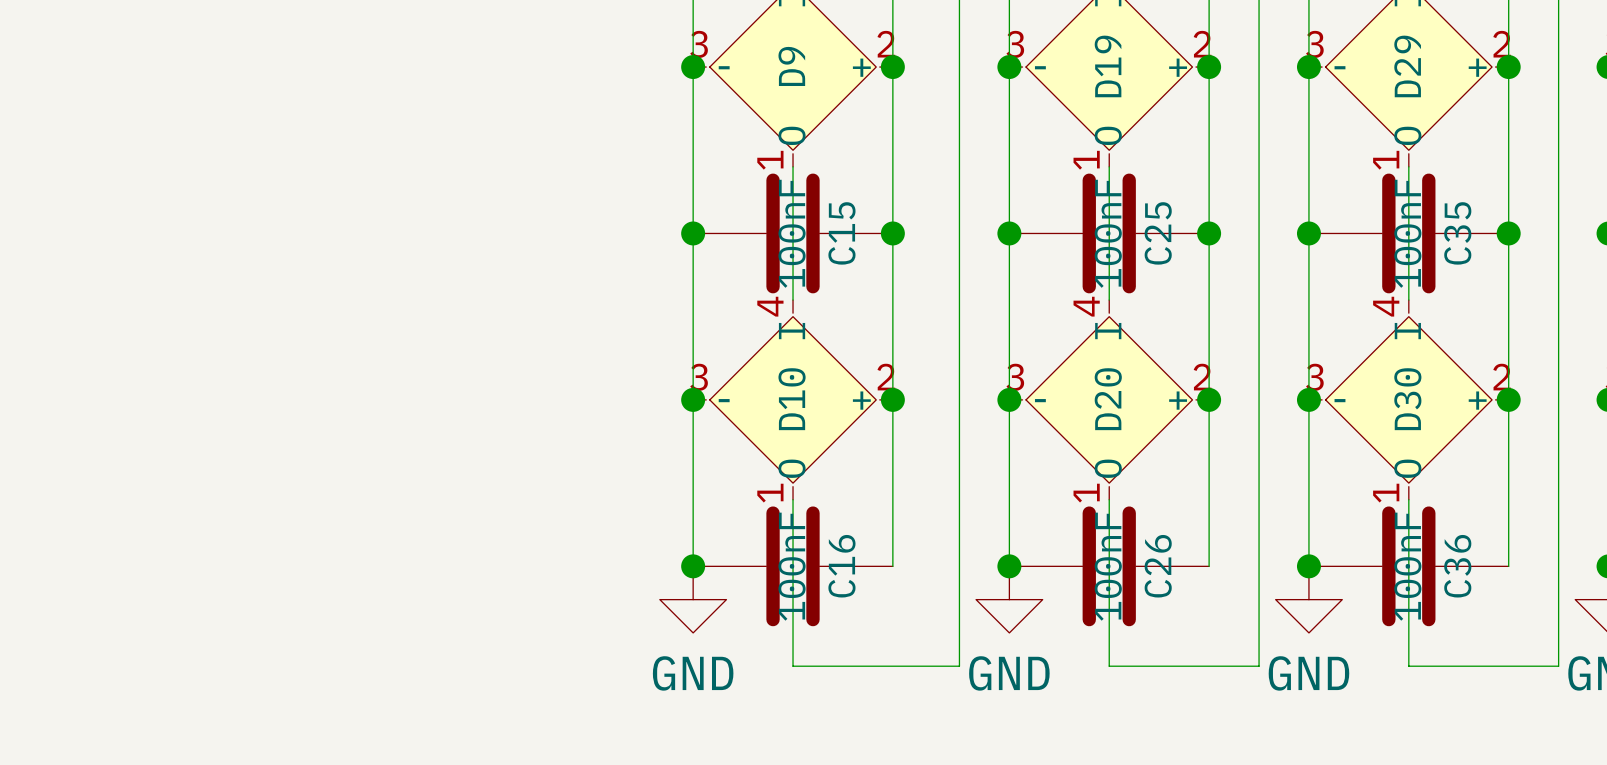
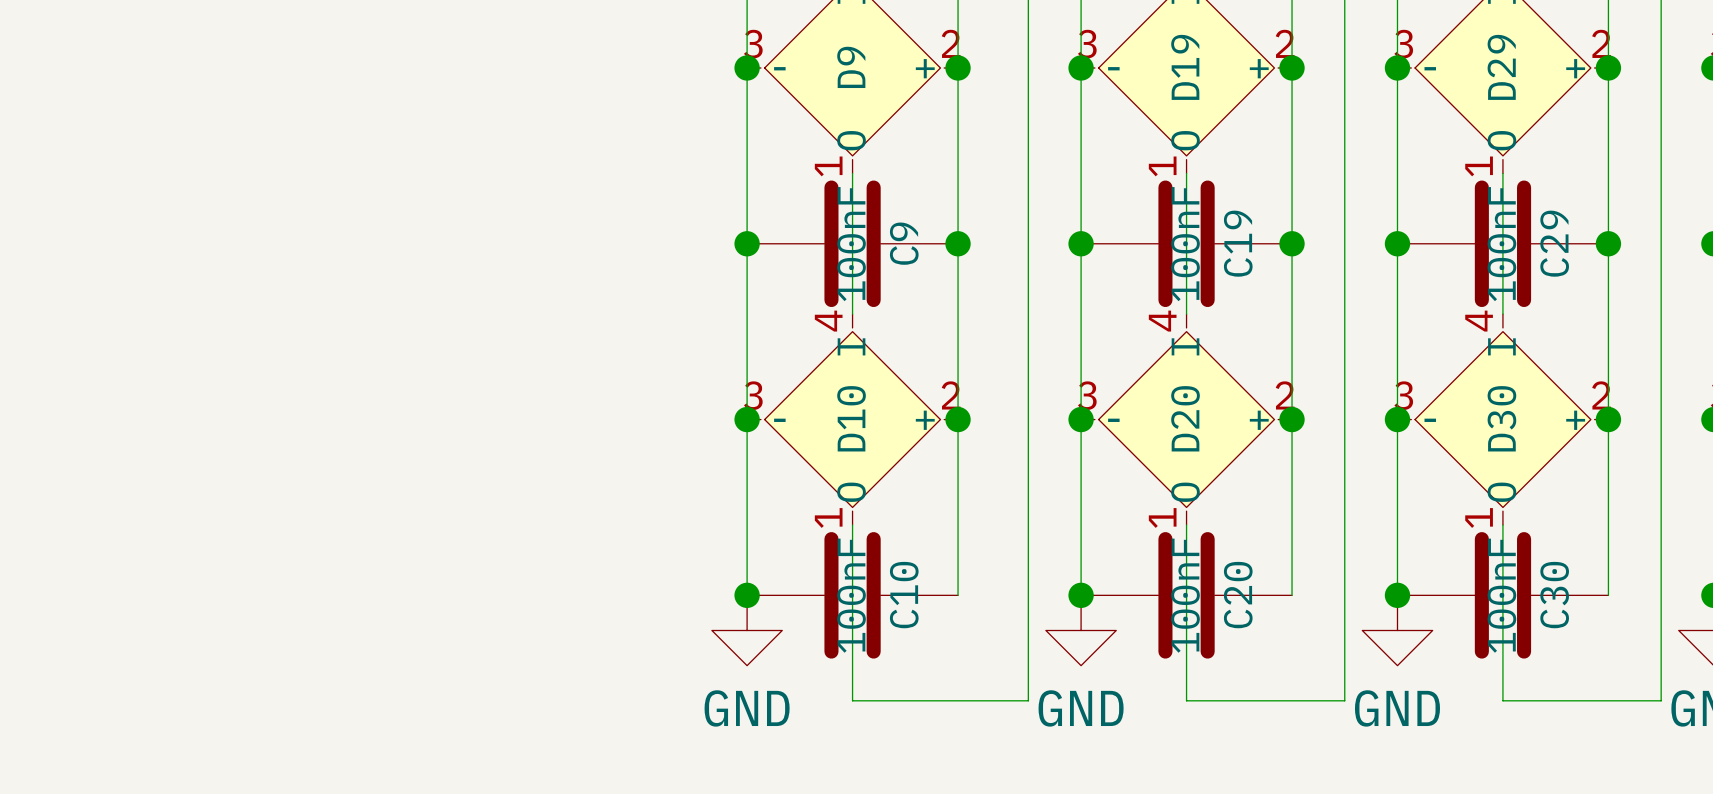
C15 name: C15 (841, 233) -> C9 (904, 243)
C25 name: C25 (1158, 233) -> C19 (1238, 243)
C35 name: C35 (1457, 233) -> C29 (1554, 243)
C16 name: C16 (841, 566) -> C10 (904, 595)
C26 name: C26 (1158, 566) -> C20 (1238, 595)
C36 name: C36 (1457, 566) -> C30 (1554, 595)

